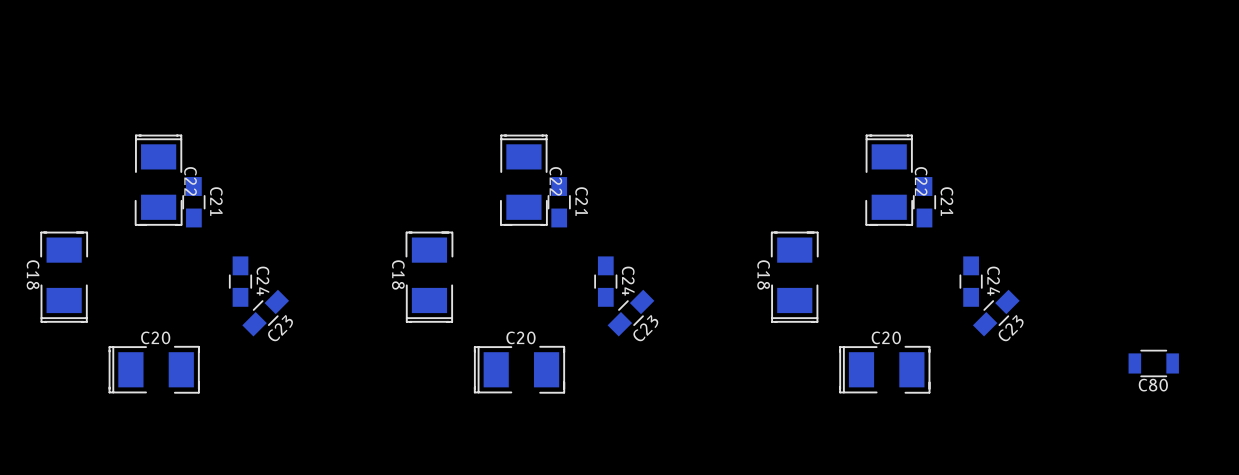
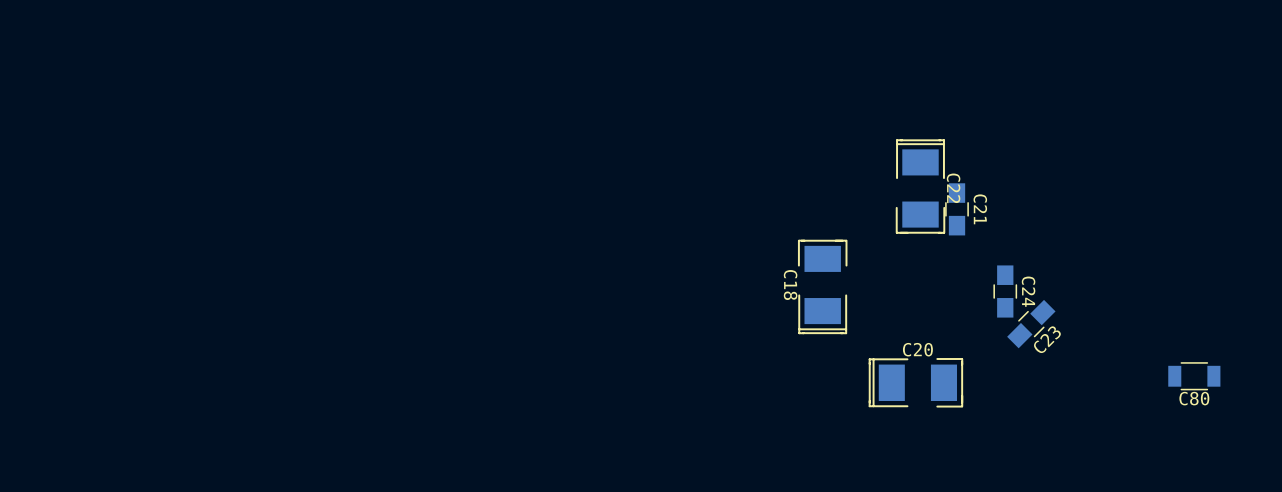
C22: (158, 180) -> none
C22: (523, 180) -> none
C21: (193, 202) -> none
C21: (559, 202) -> none
C18: (64, 277) -> none
C18: (429, 277) -> none
C24: (240, 281) -> none
C24: (605, 281) -> none
C23: (265, 313) -> none
C23: (630, 313) -> none
C20: (154, 369) -> none
C20: (519, 369) -> none

